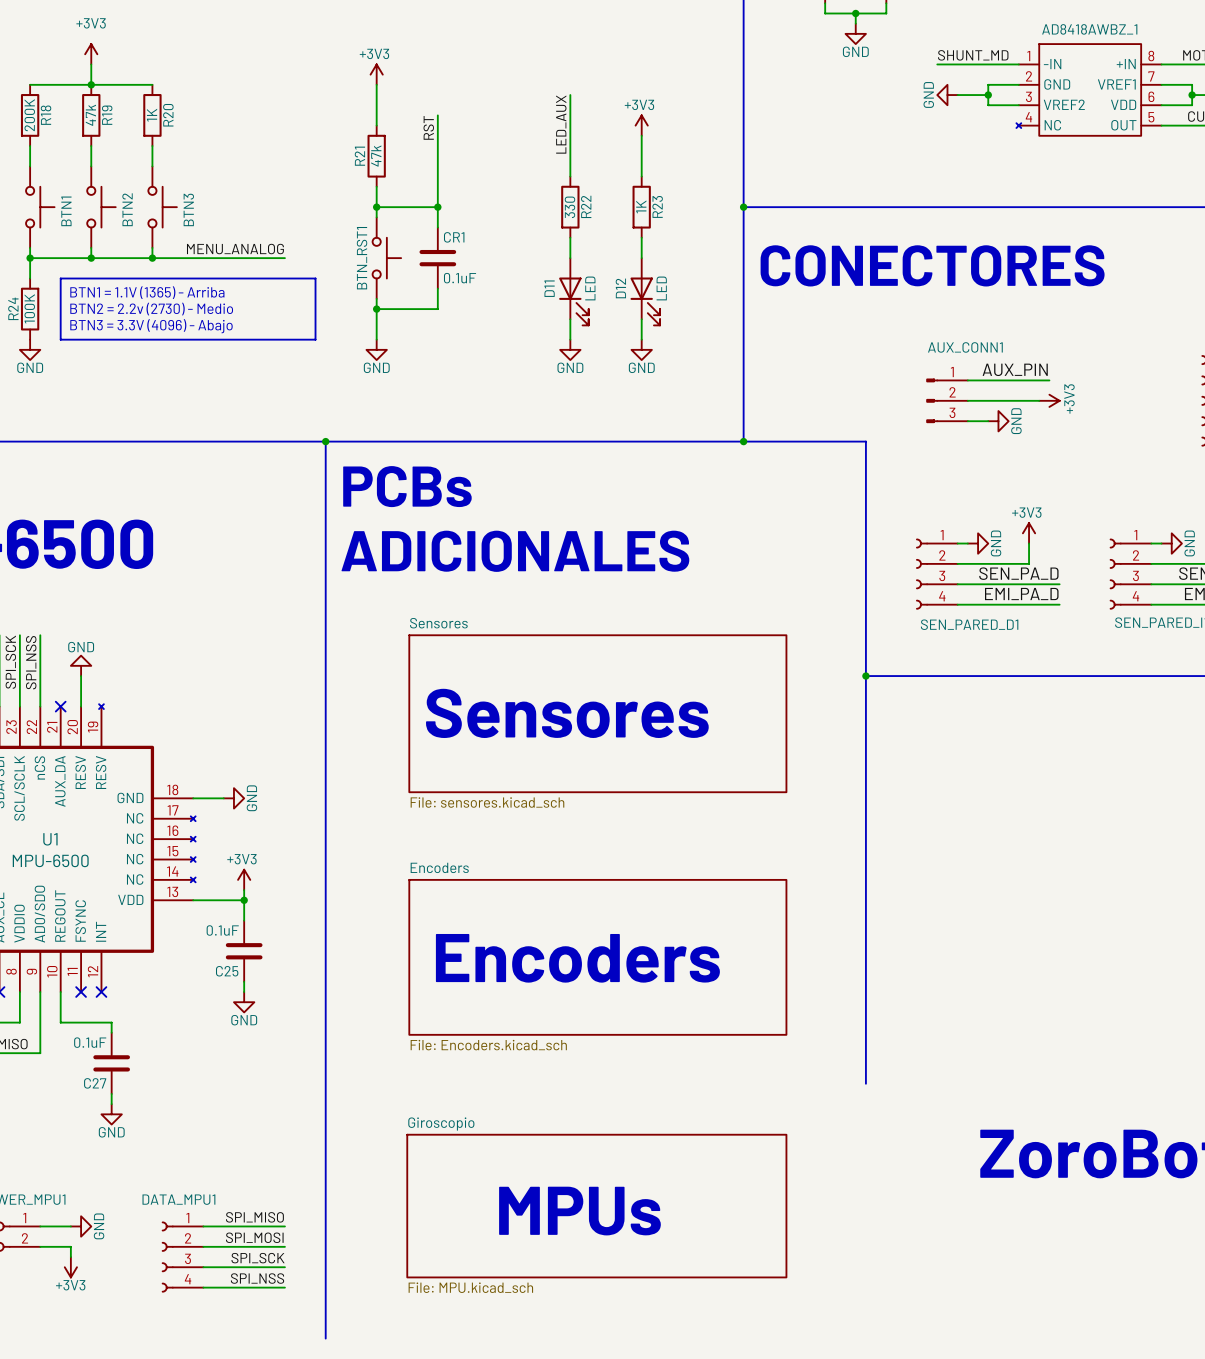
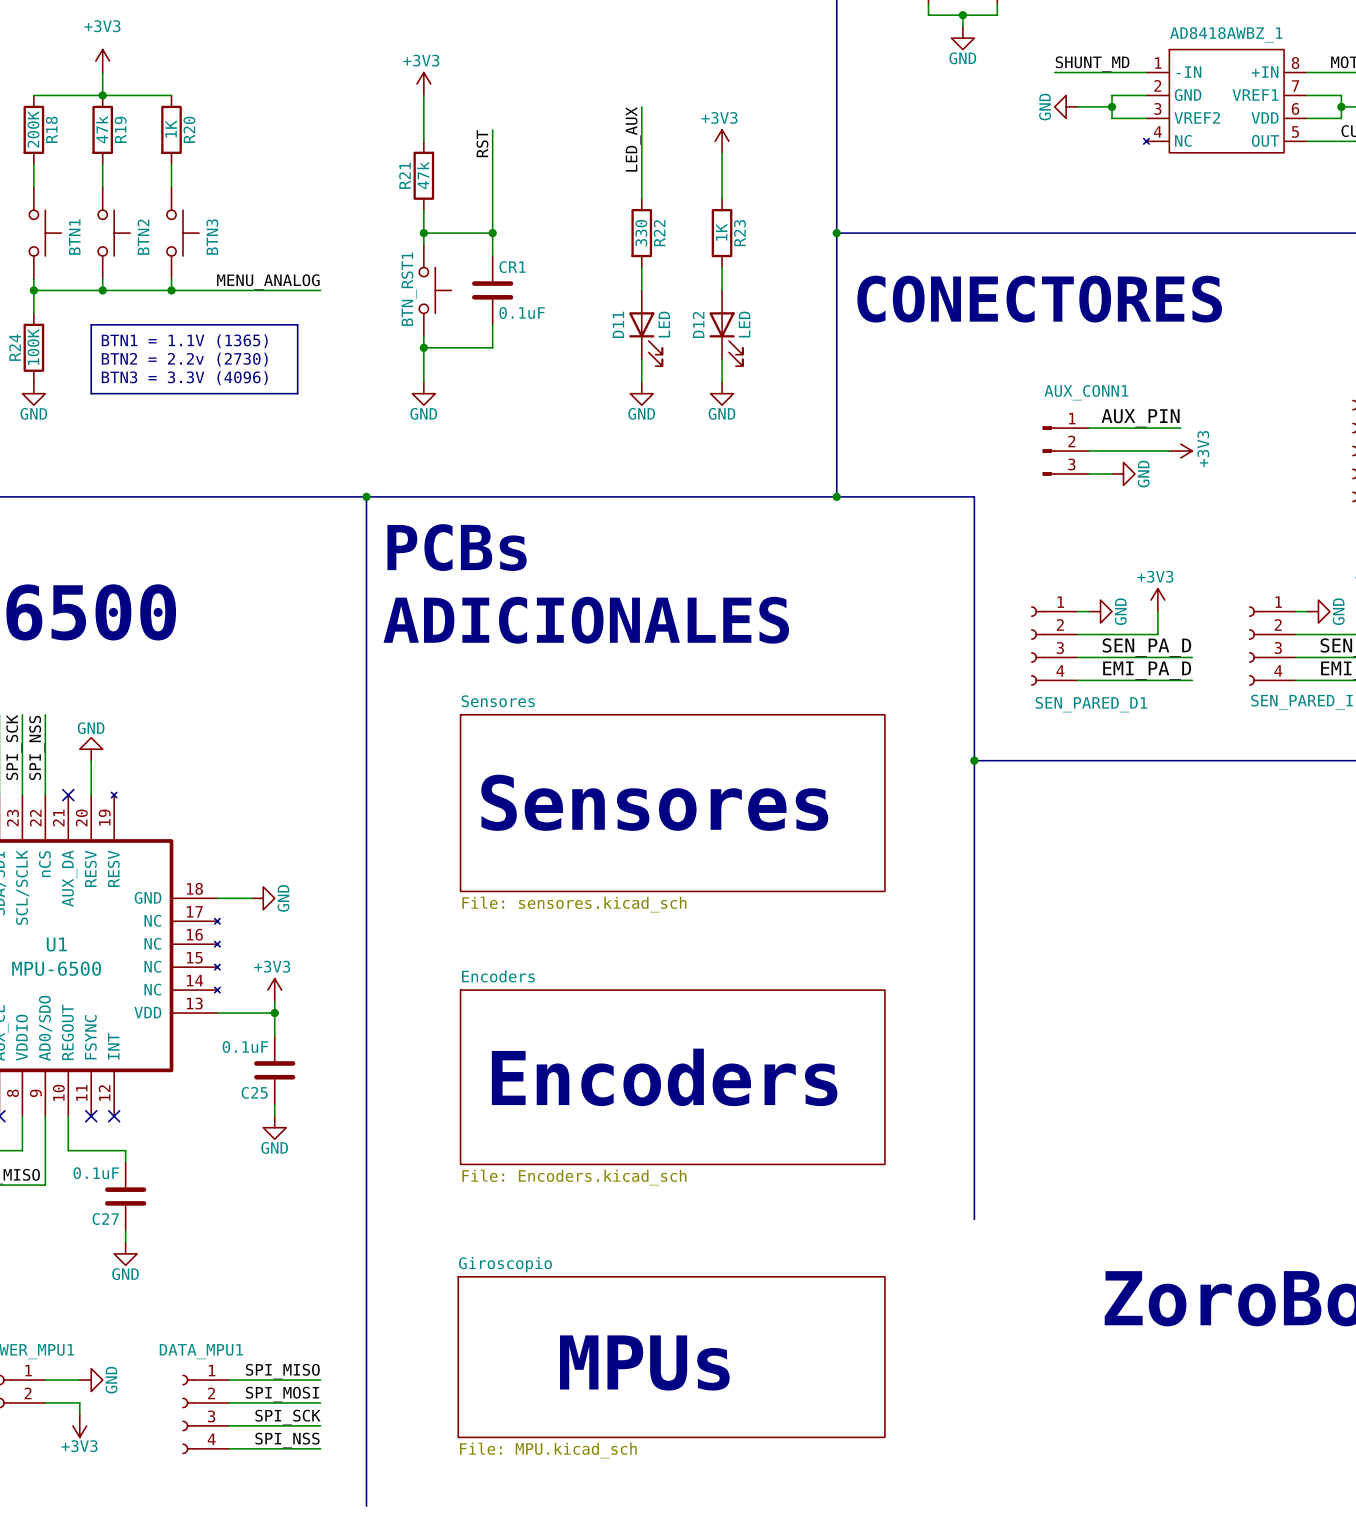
line: (60, 278) (315, 278) (315, 339) (60, 339) (60, 278) -> (91, 324) (91, 393) (297, 393) (297, 324) (91, 324)
text: BTN1 = 1.1V (1365) - Arriba (147, 292) -> BTN1 = 1.1V (1365) (184, 341)
text: BTN2 = 2.2v (2730) - Medio (151, 309) -> BTN2 = 2.2v (2730) (184, 359)
text: BTN3 = 3.3V (4096) - Abajo (151, 326) -> BTN3 = 3.3V (4096) (184, 378)

